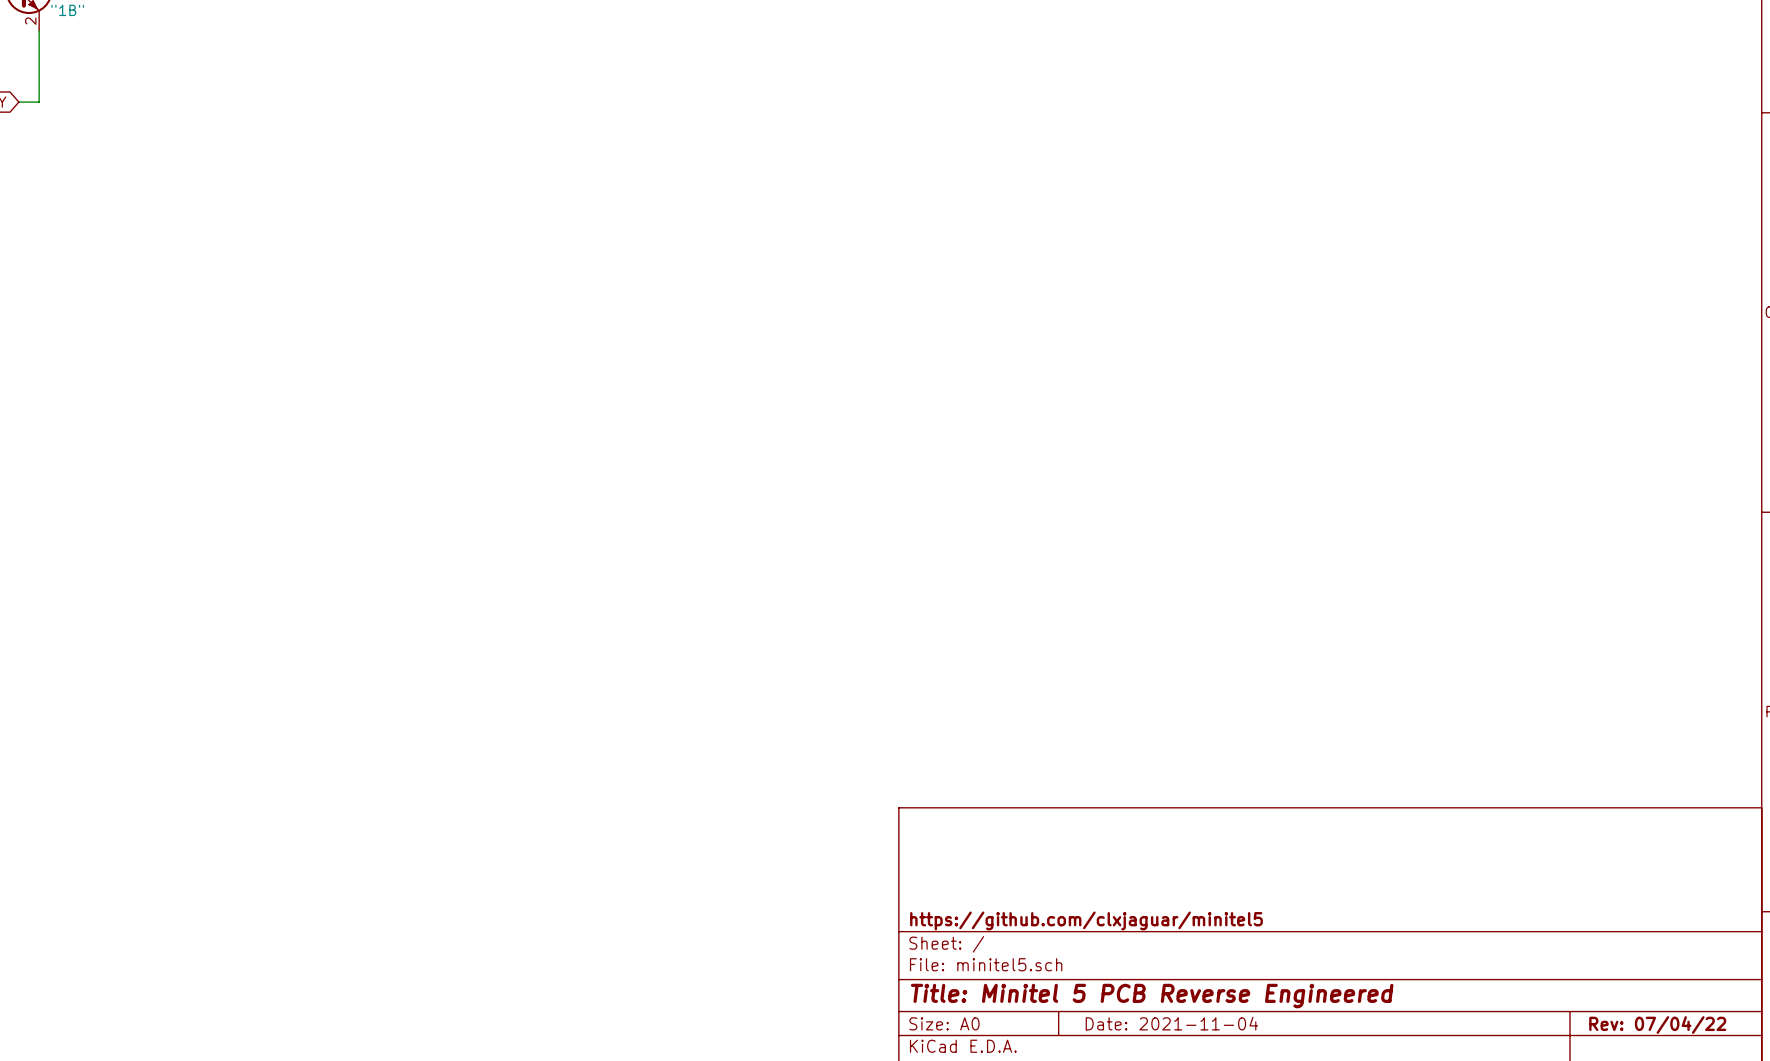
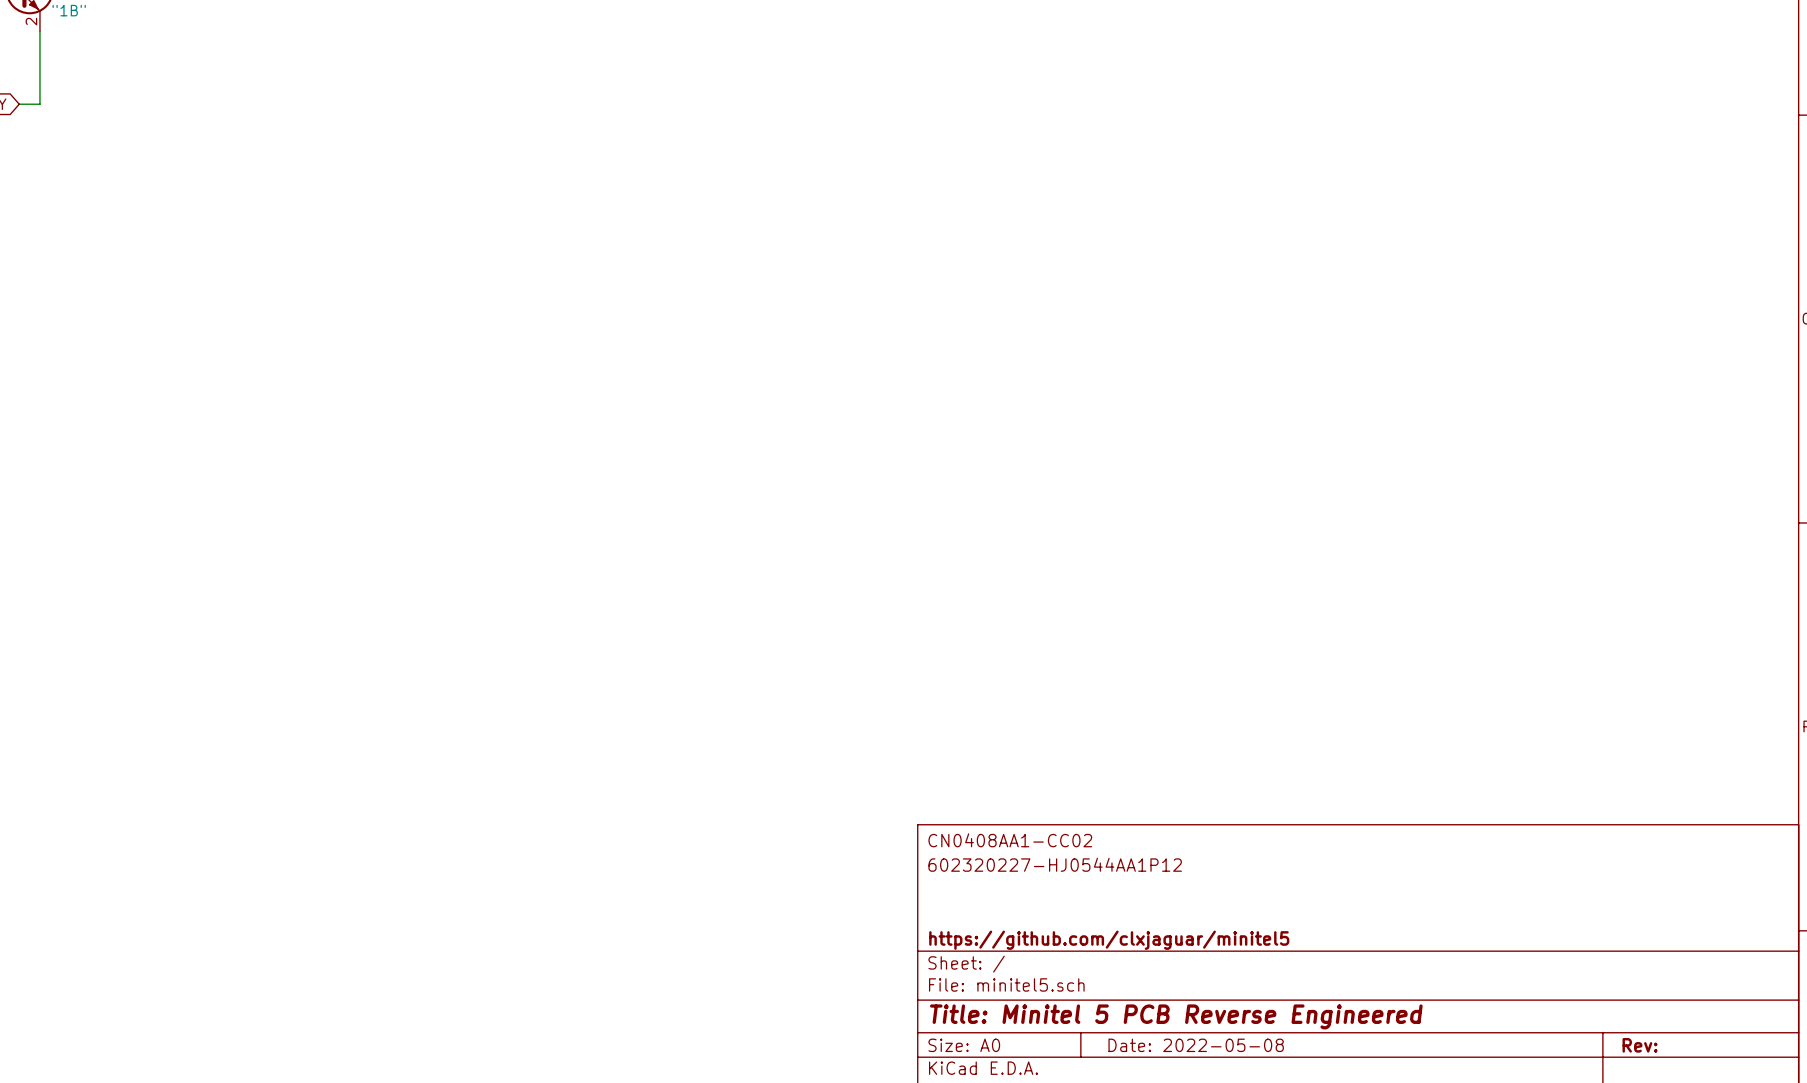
title block: none -> CN0408AA1-CC02 (1010, 840)
title block: none -> 602320227-HJ0544AA1P12 (1055, 864)
title block: Date: 2021-11-04 (1171, 1023) -> Date: 2022-05-08 (1196, 1045)
title block: Rev: 07/04/22 (1657, 1025) -> Rev: (1640, 1045)

